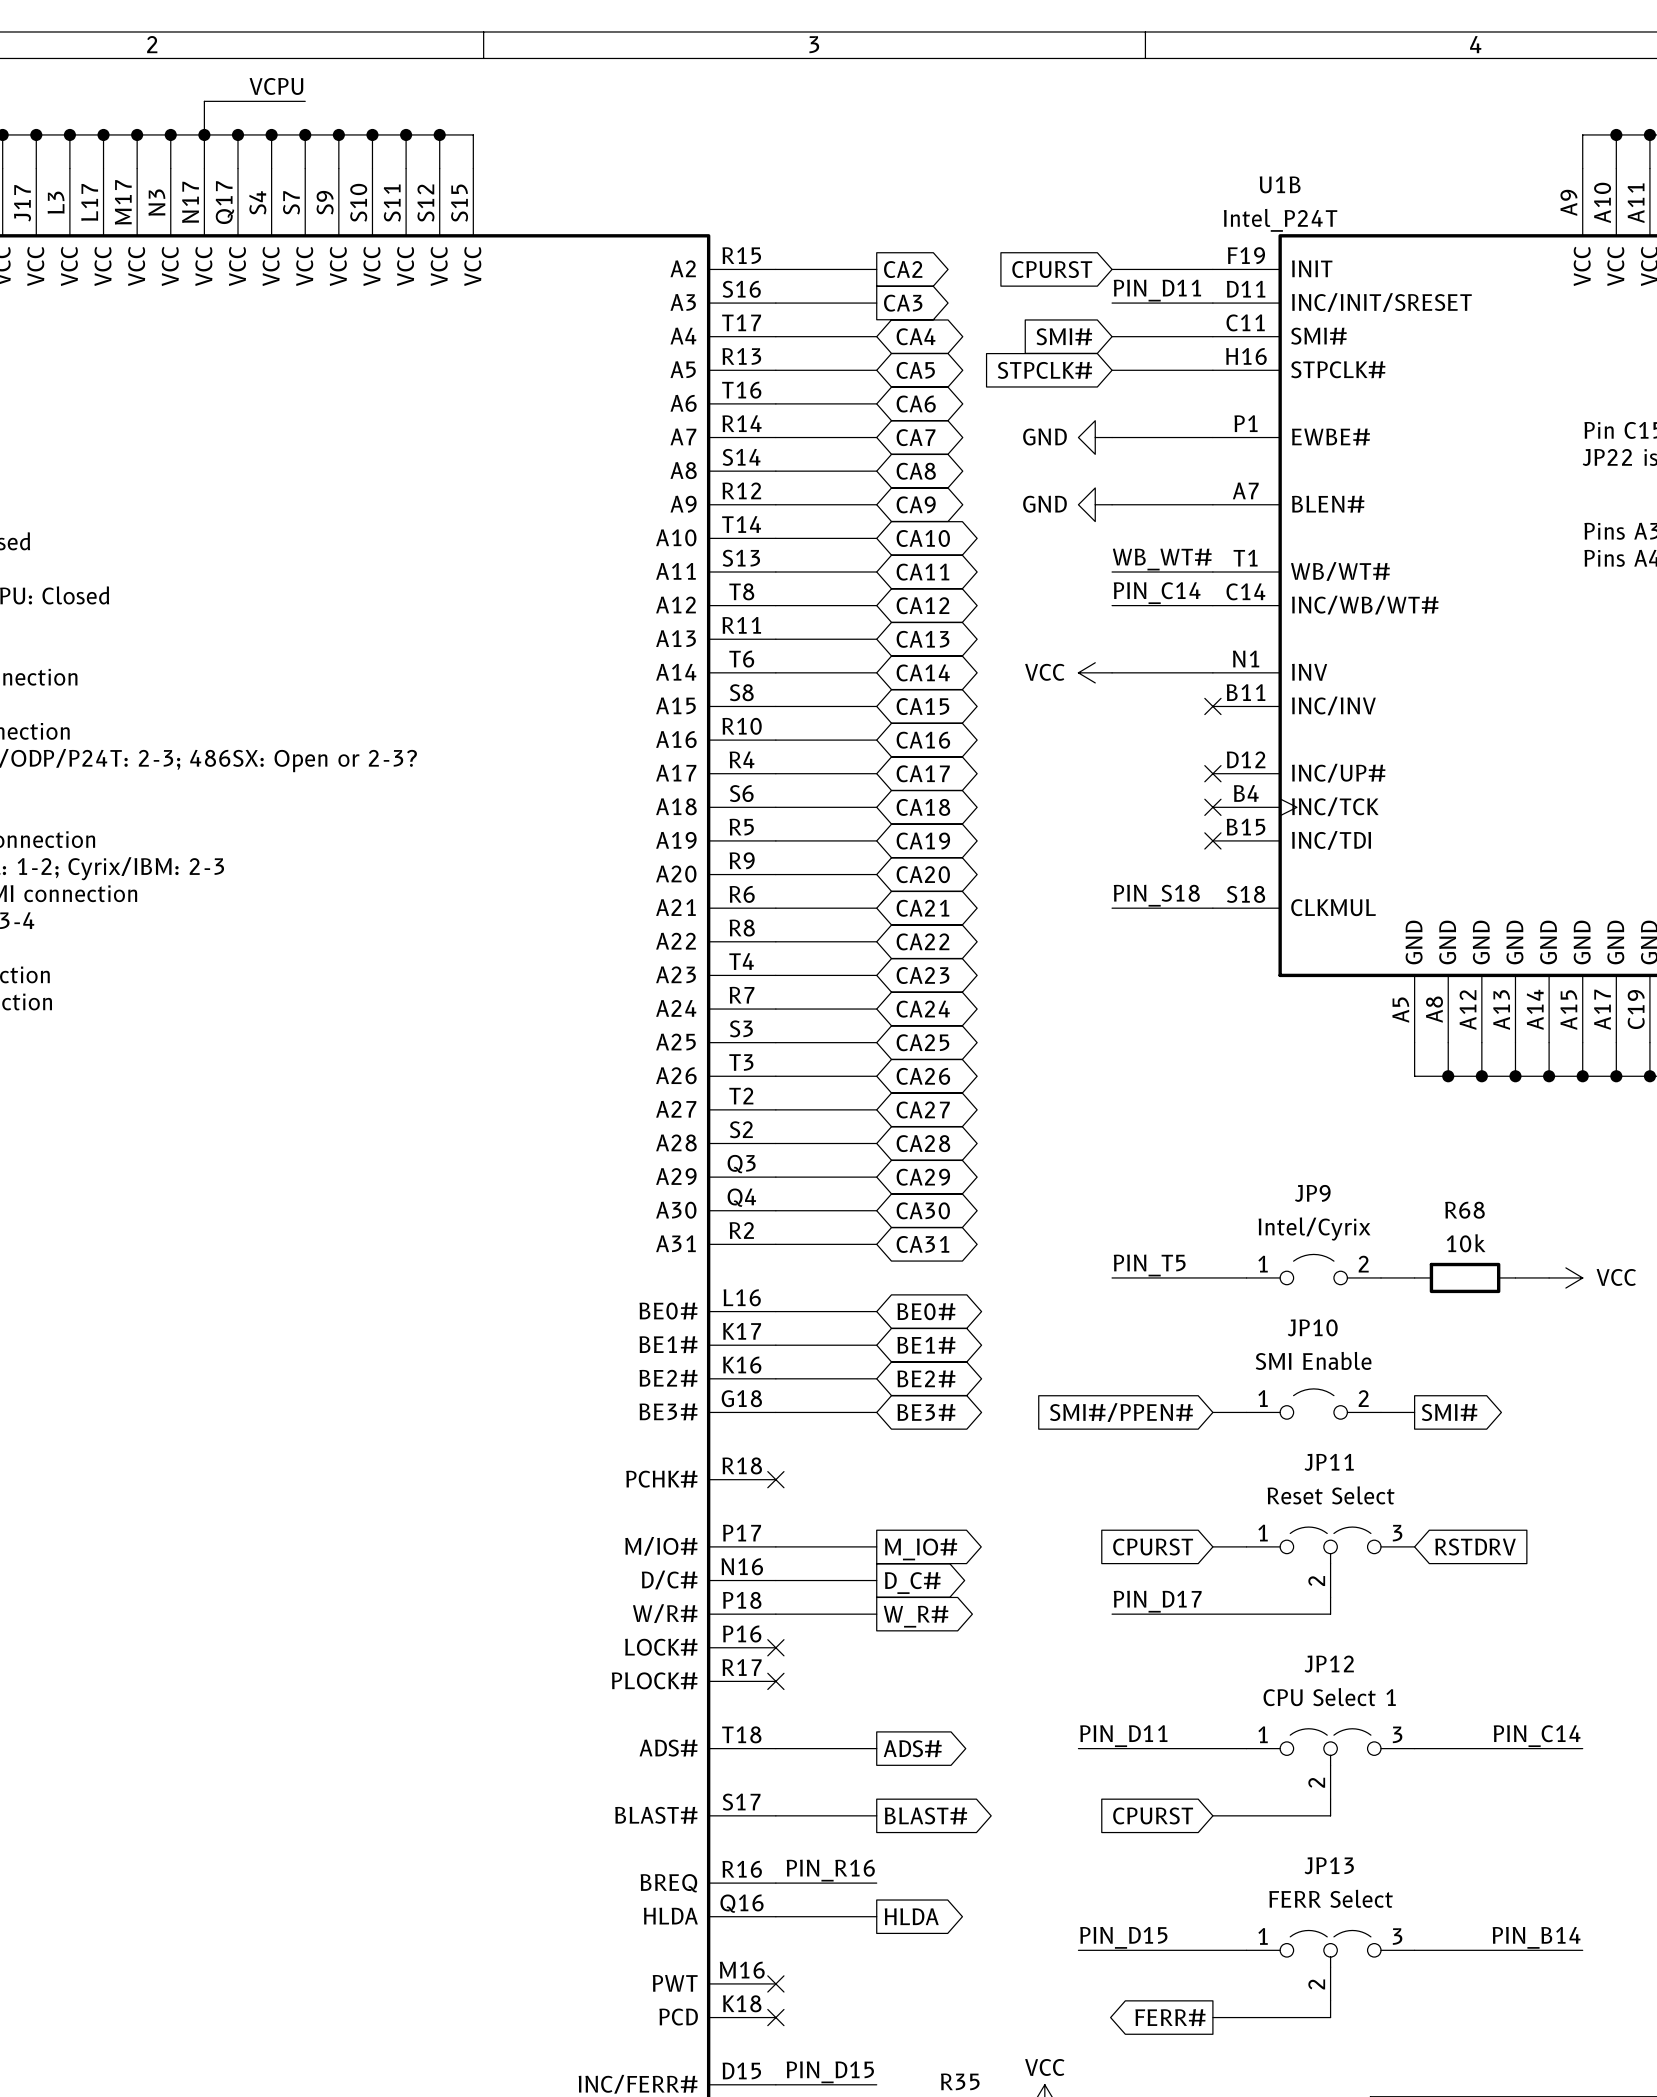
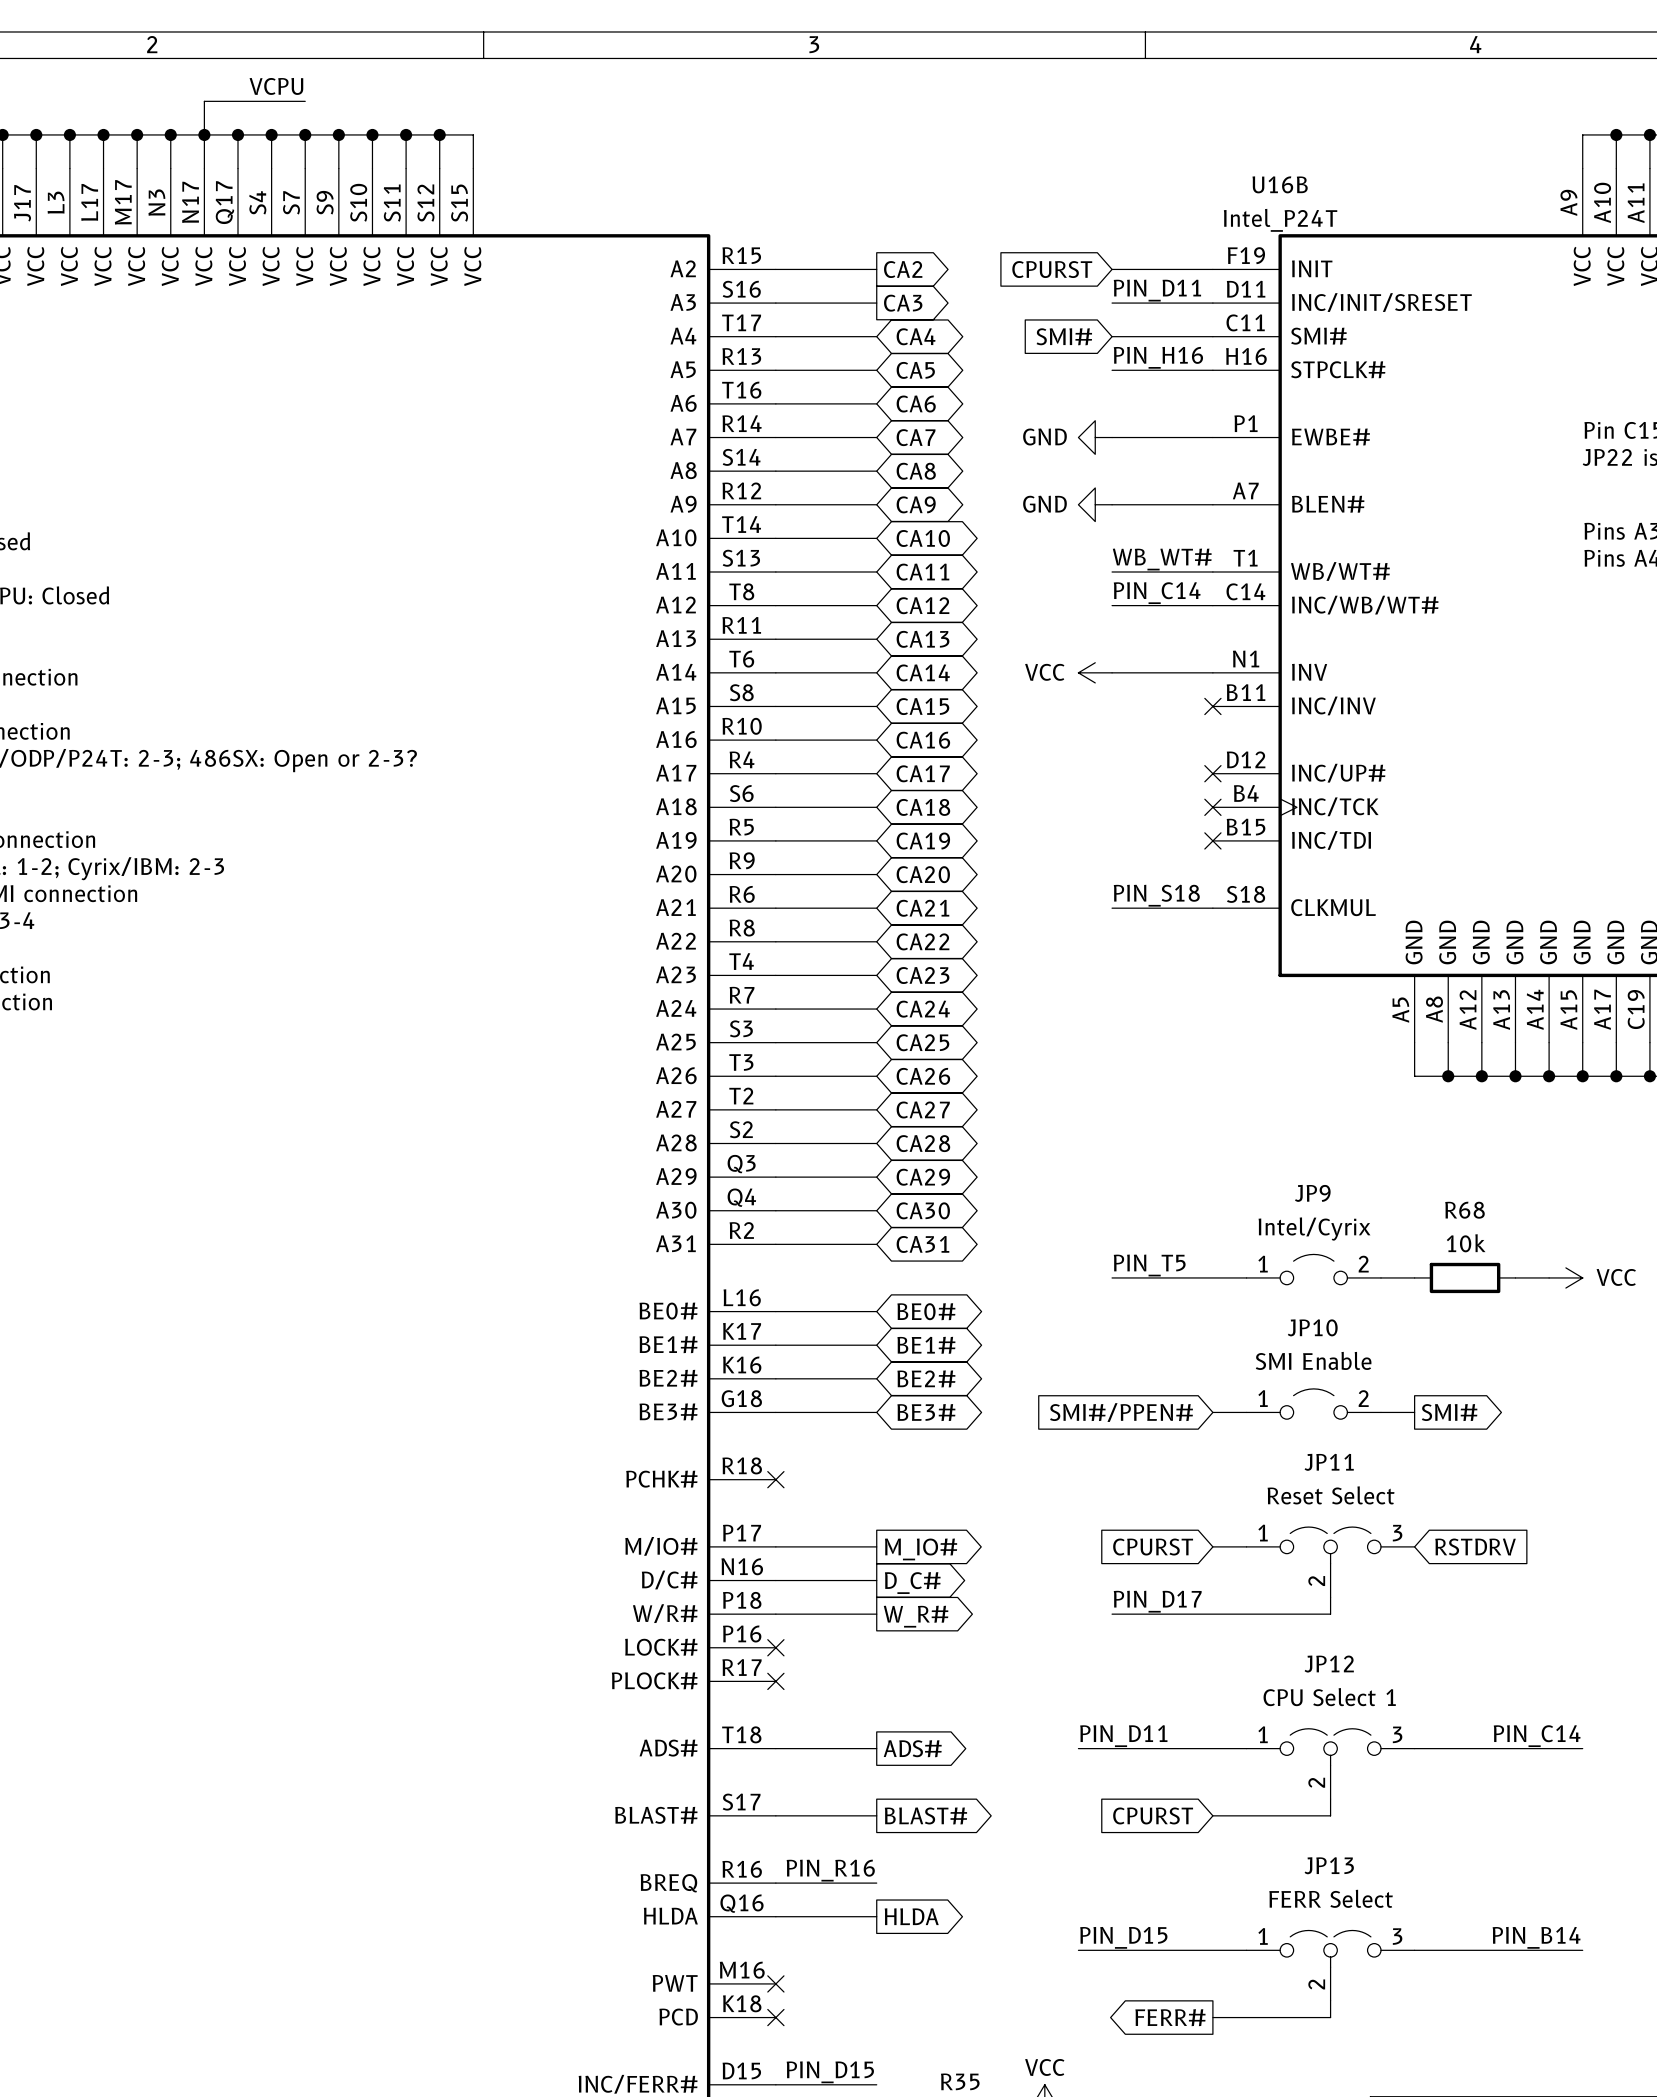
U1B name: U1B (1280, 184) -> U16B (1280, 184)
label: none -> PIN_H16 (1158, 357)
global label: STPCLK# (1044, 370) -> none

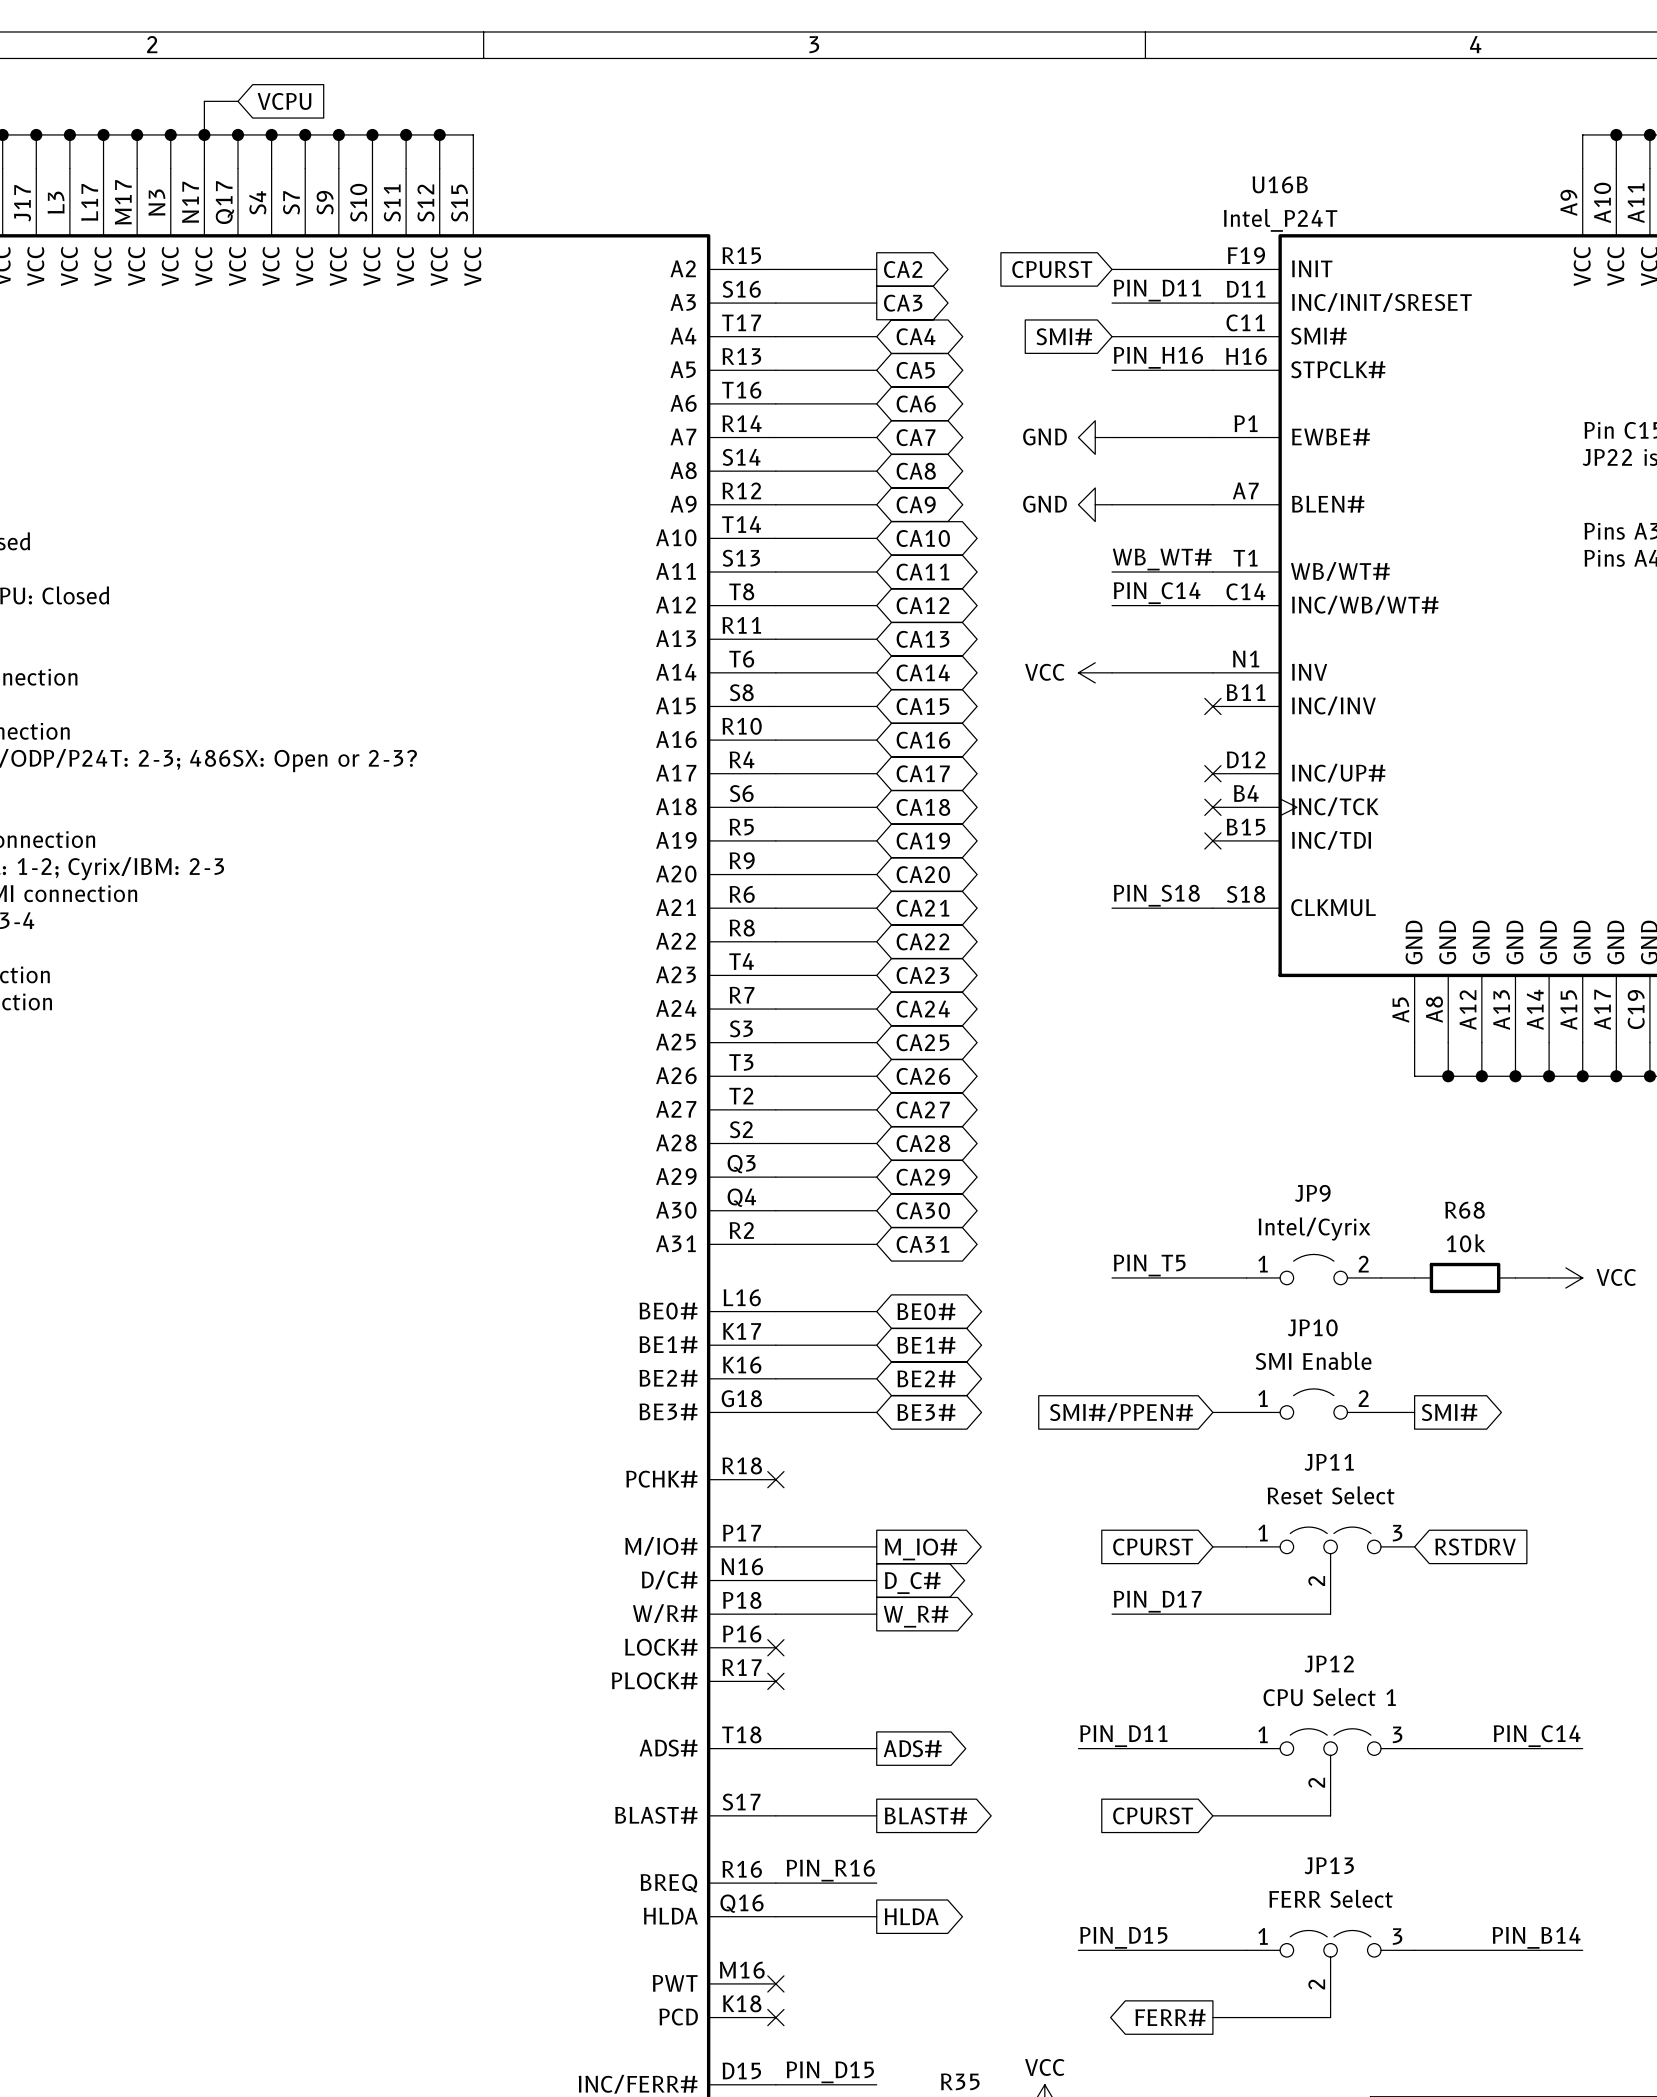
label: VCPU (276, 86) -> none
wire: (238, 101) (305, 101) -> none
global label: none -> VCPU (284, 101)

